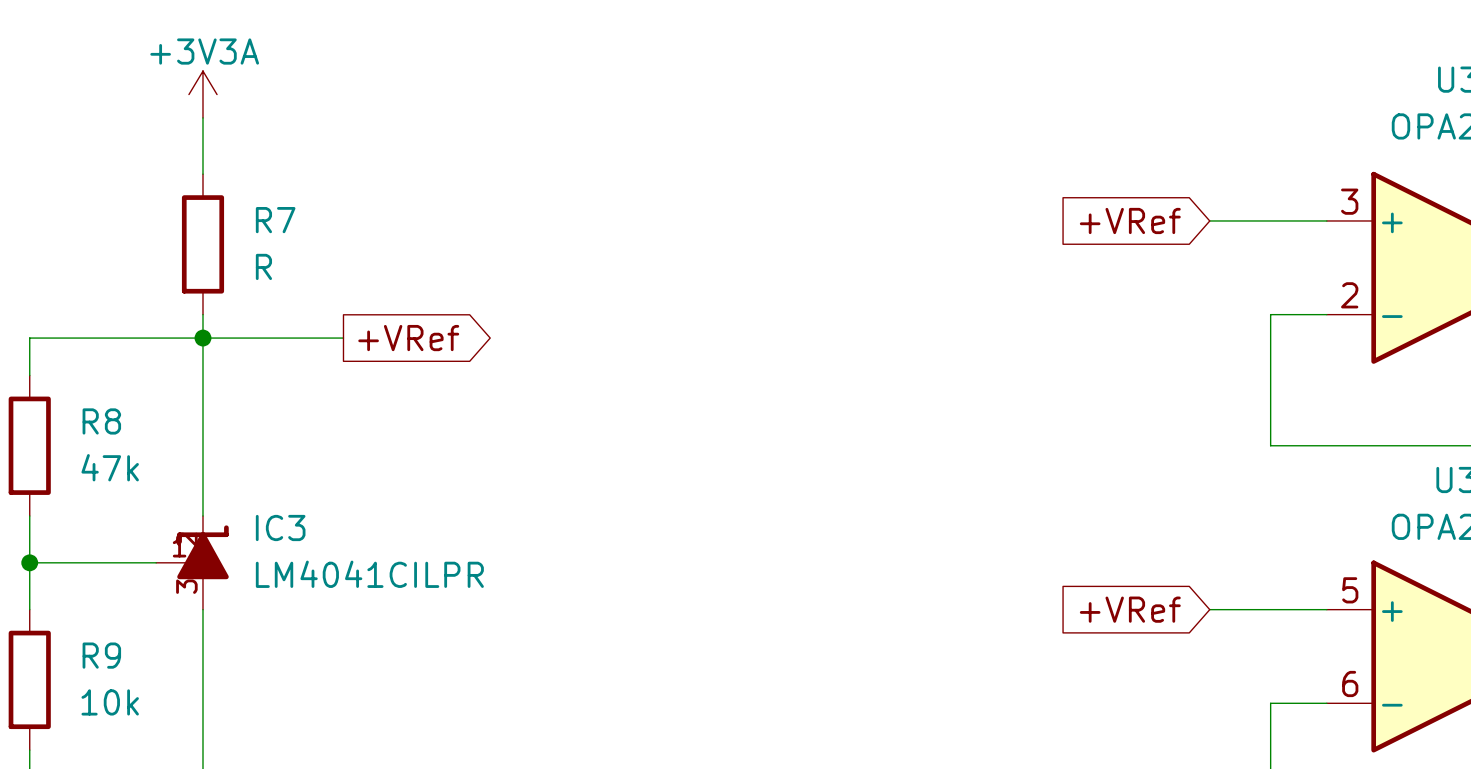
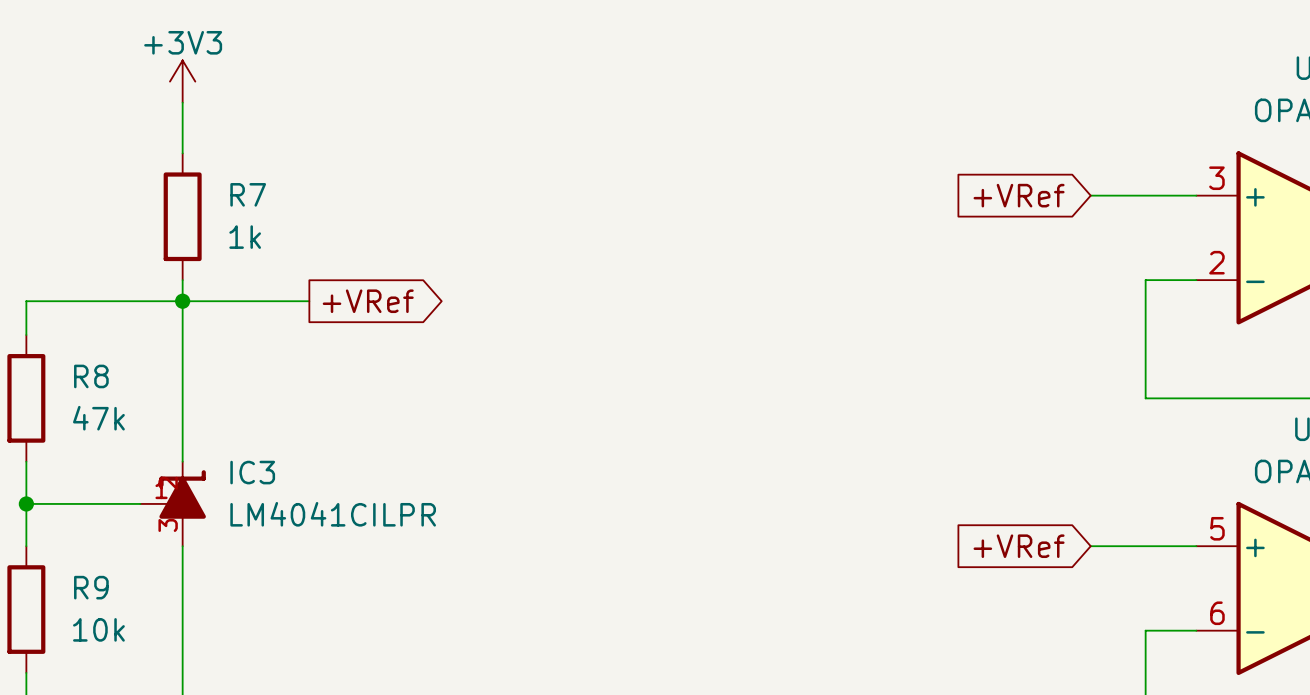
power symbol: +3V3A (202, 94) -> +3V3 (182, 81)
R7 value: R (263, 266) -> 1k (245, 237)

